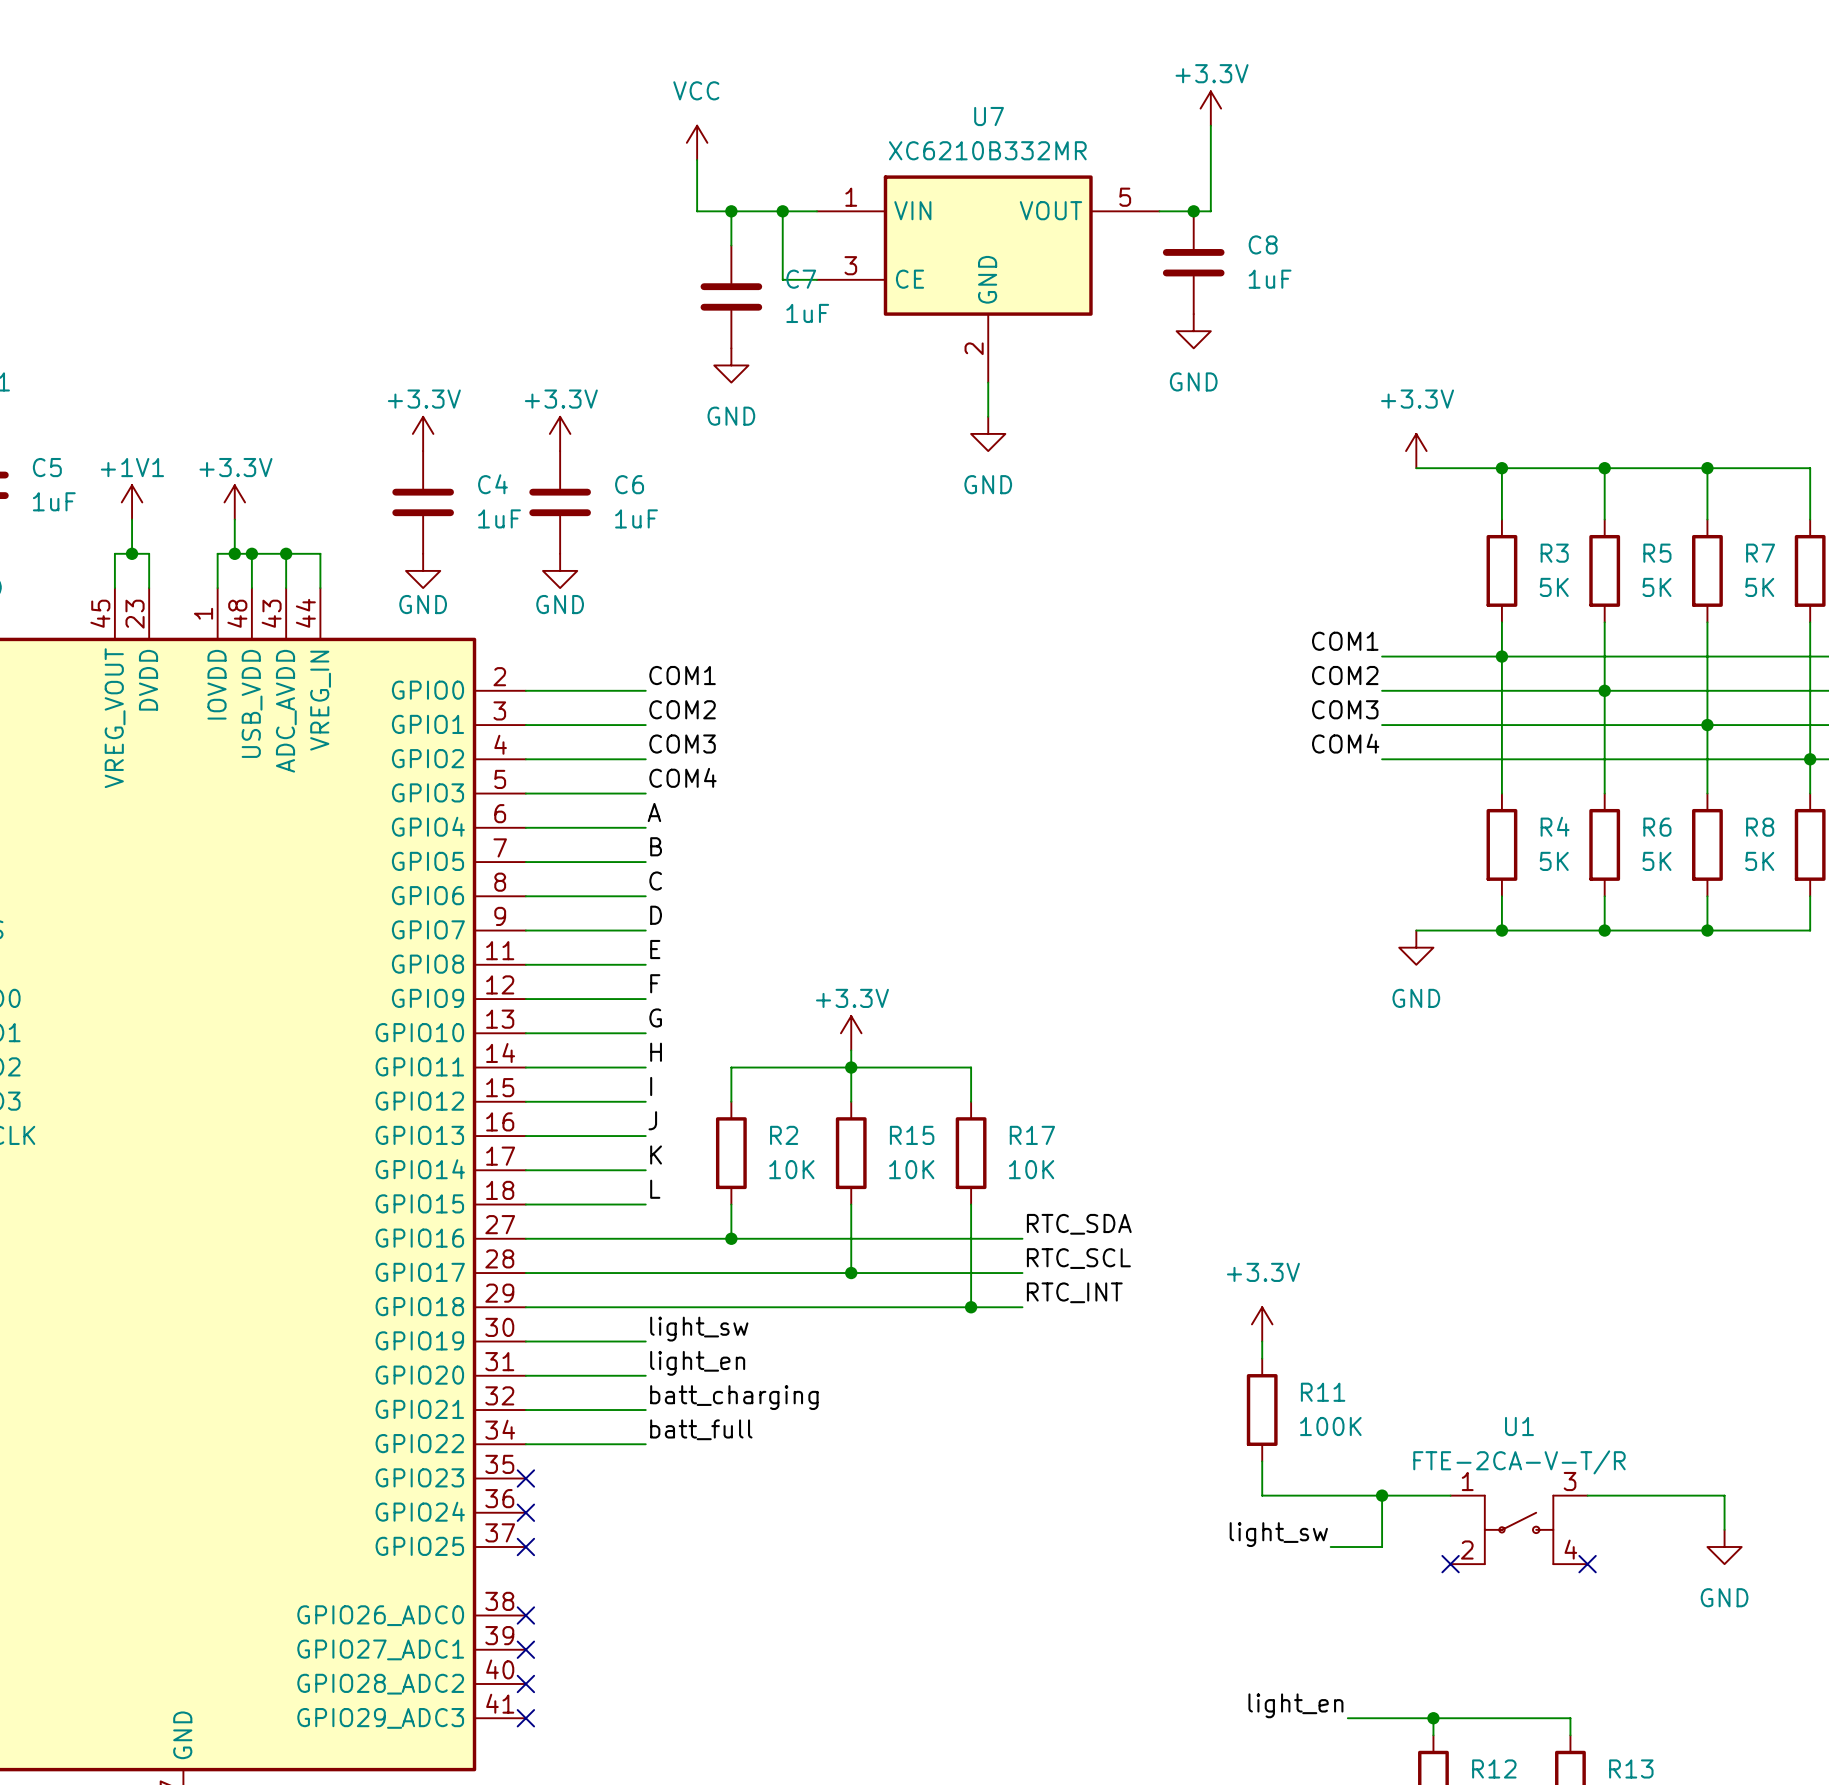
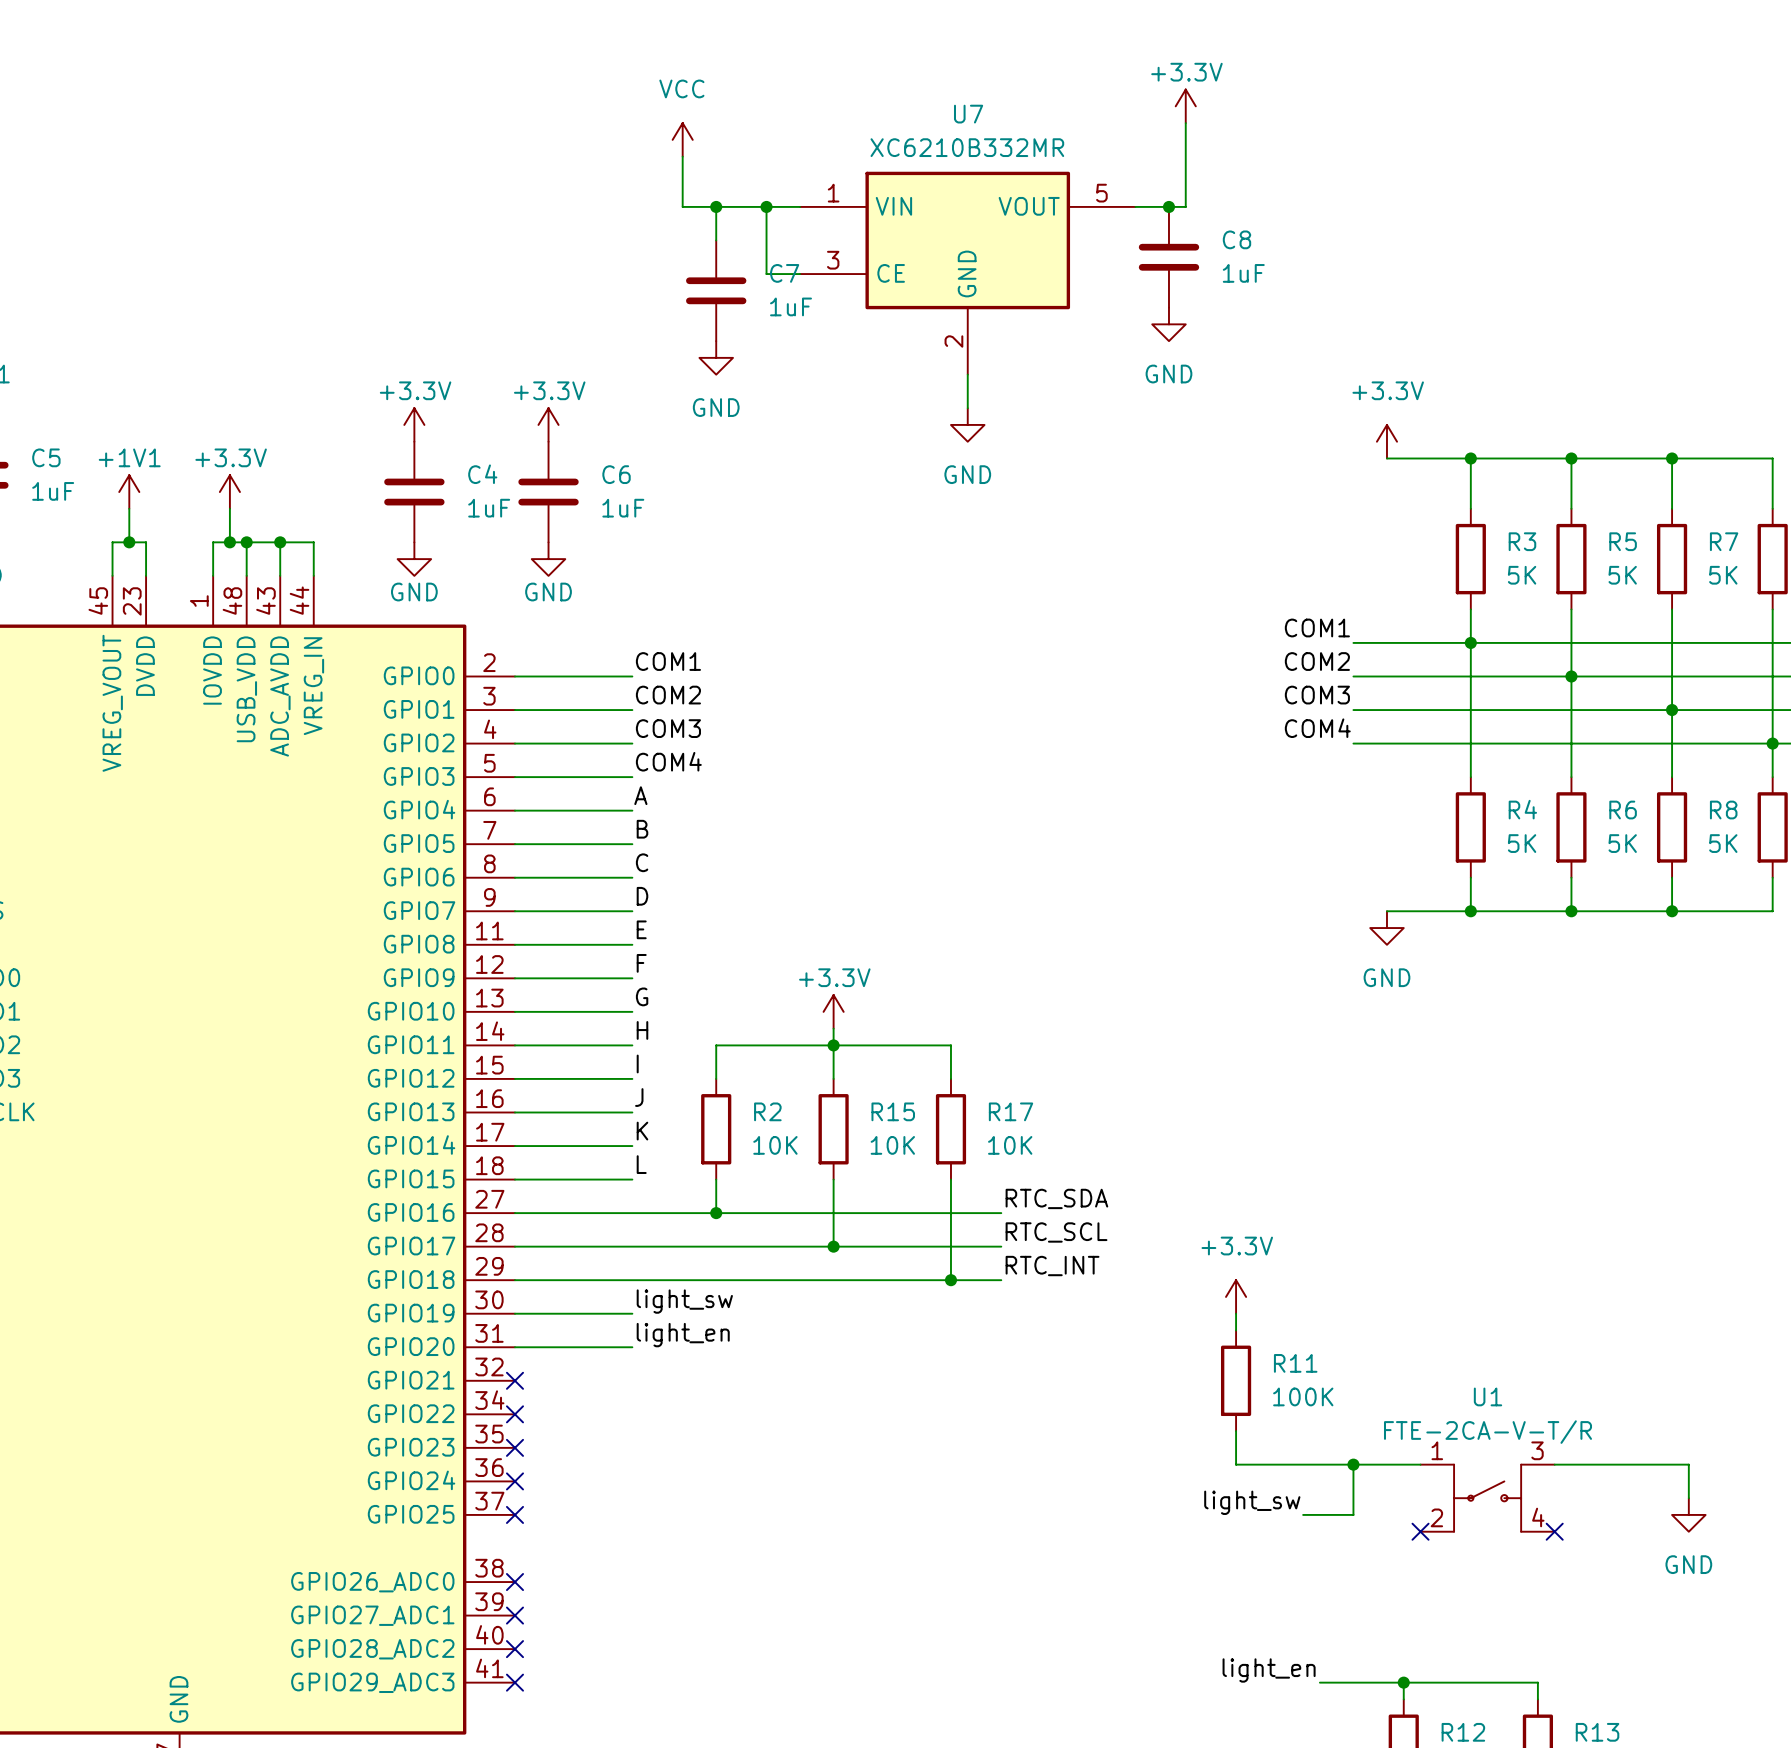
label: batt_charging (734, 1397) -> none
wire: (525, 1410) (645, 1410) -> none
no-connect mark: none -> (514, 1380)
label: batt_full (701, 1429) -> none
wire: (525, 1444) (645, 1444) -> none
no-connect mark: none -> (514, 1414)

